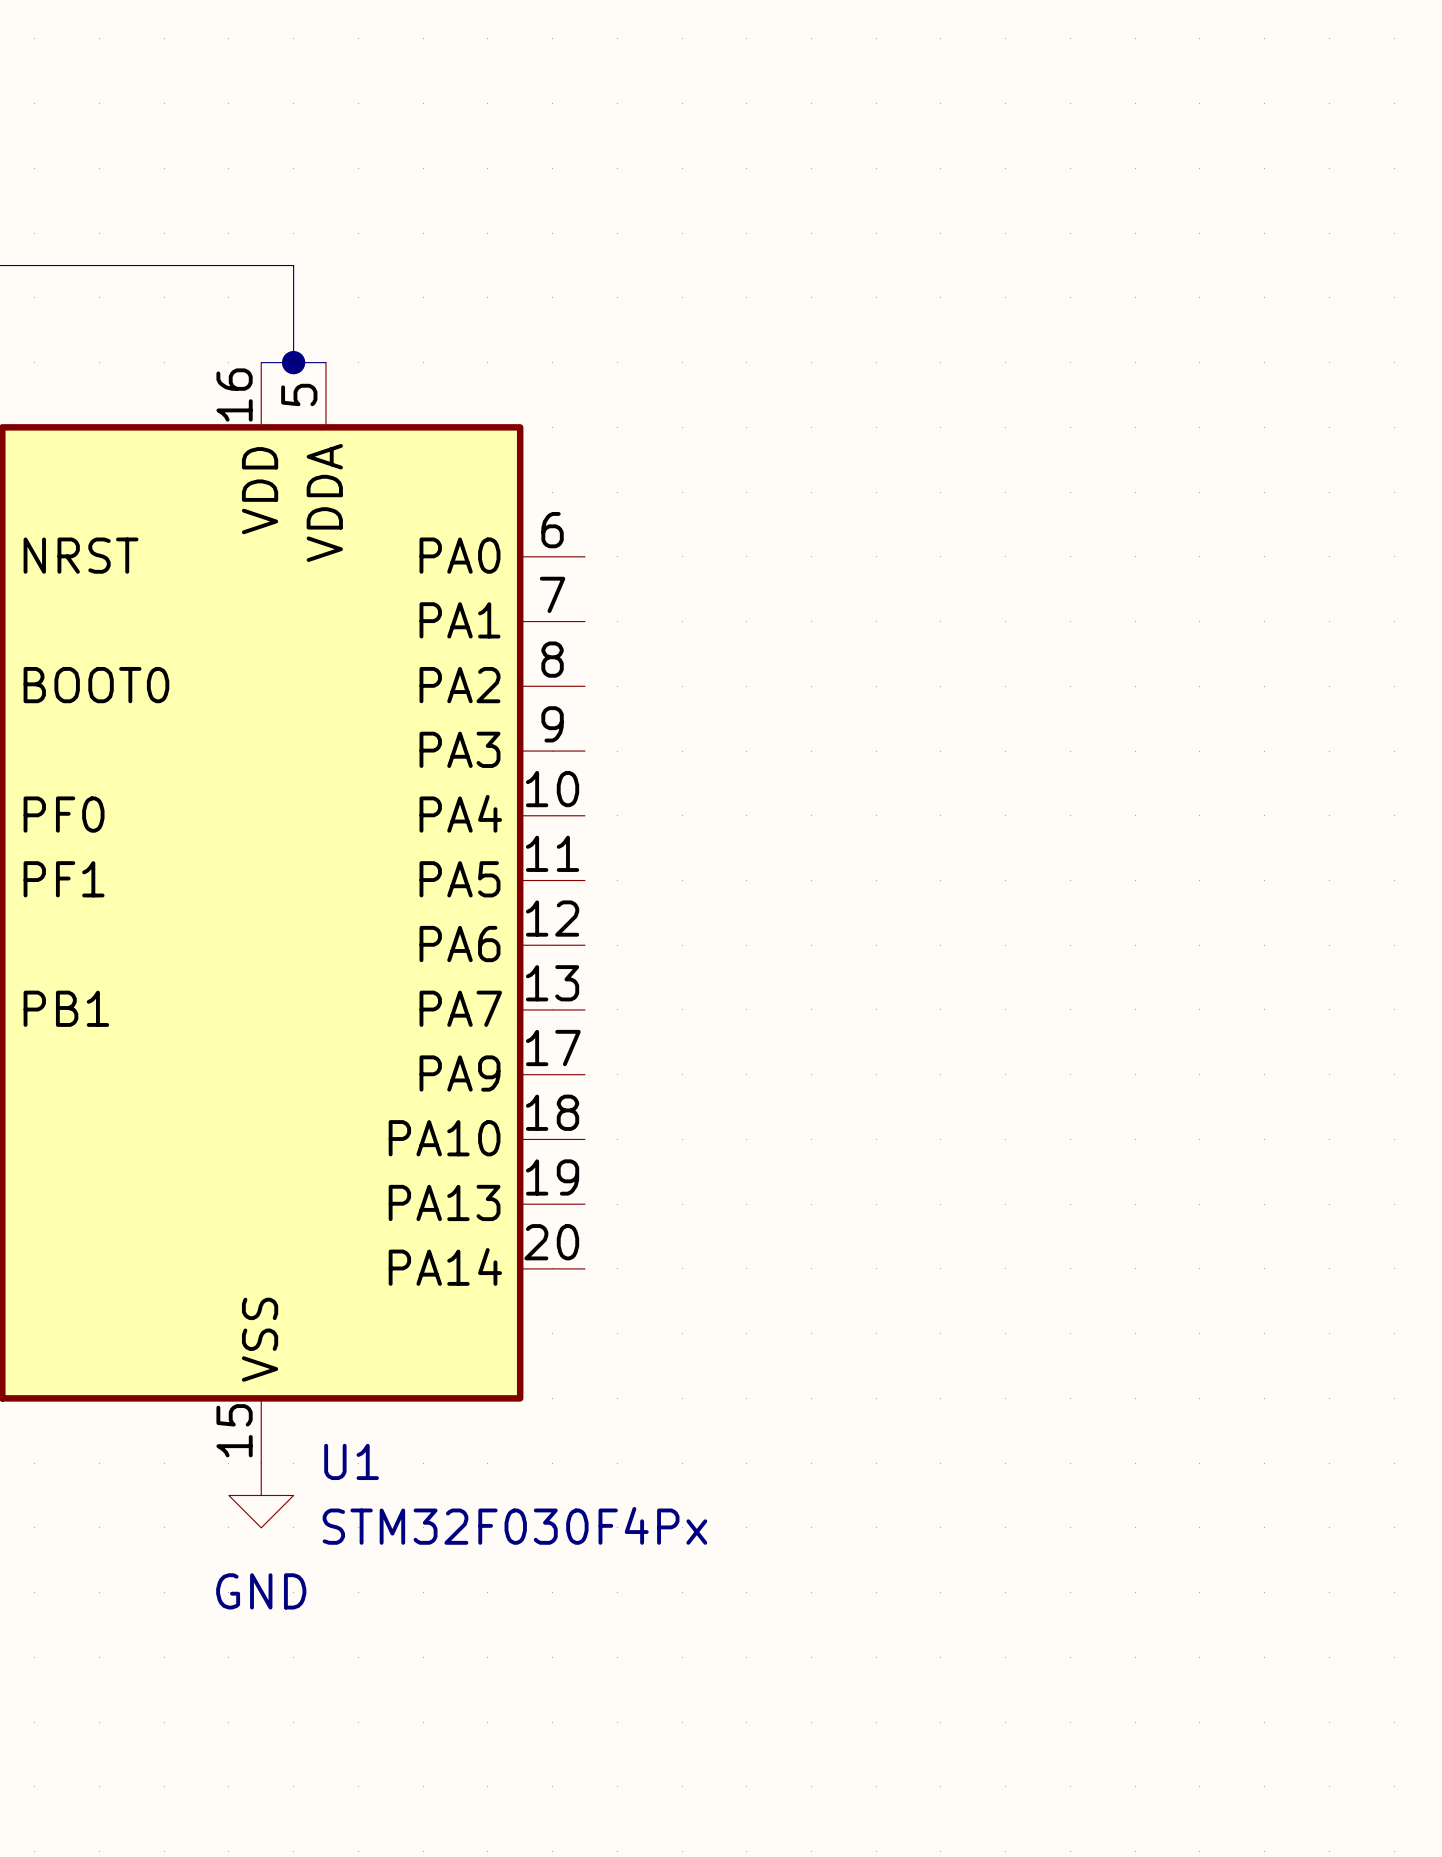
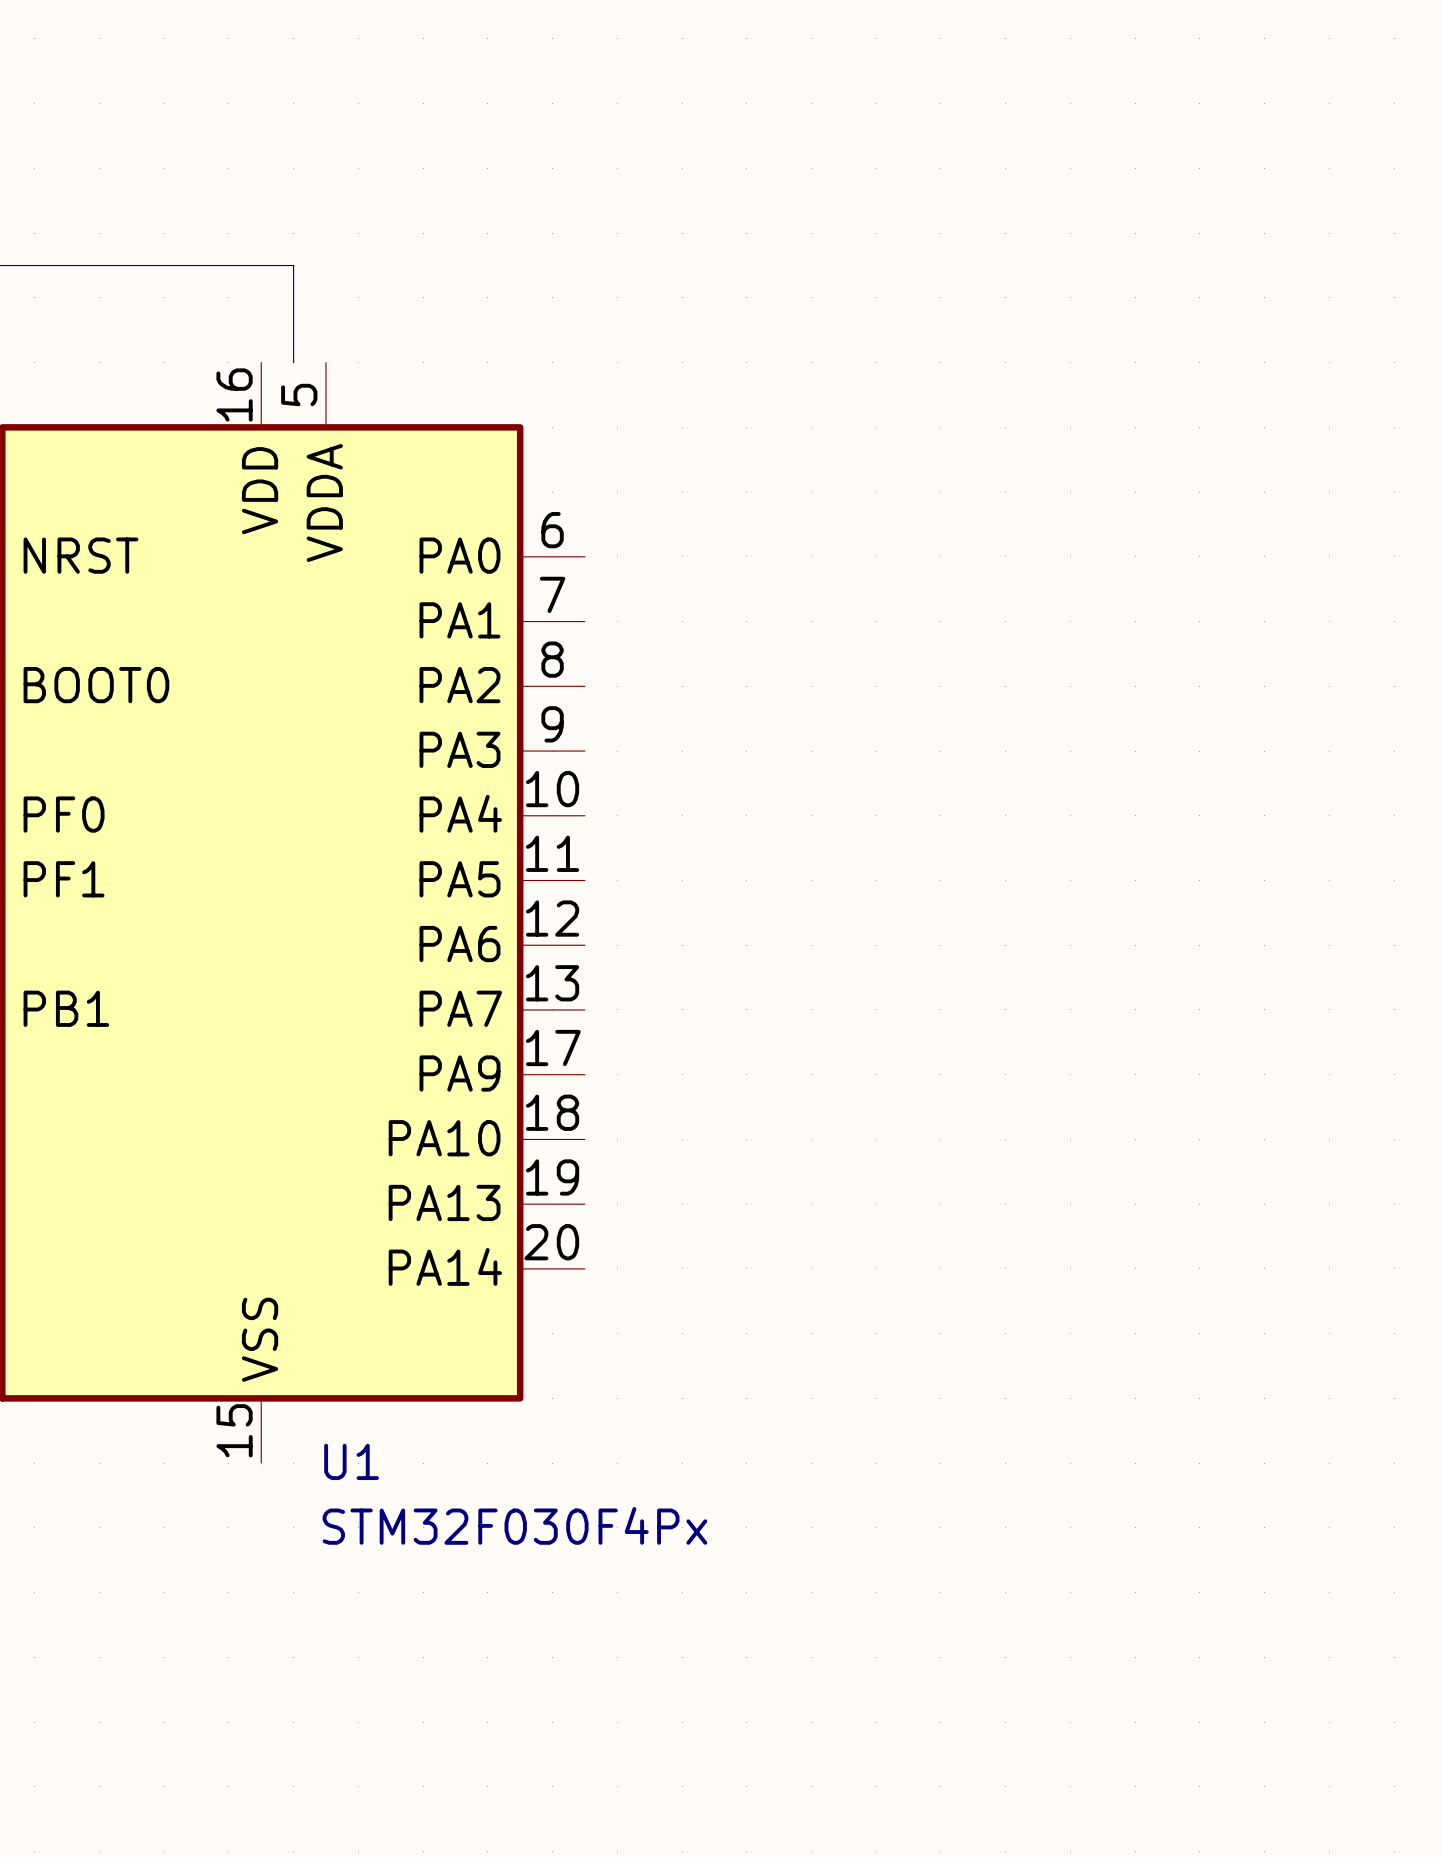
wire: (261, 362) (325, 362) -> none
junction: (293, 362) -> none
power symbol: GND (261, 1495) -> none

